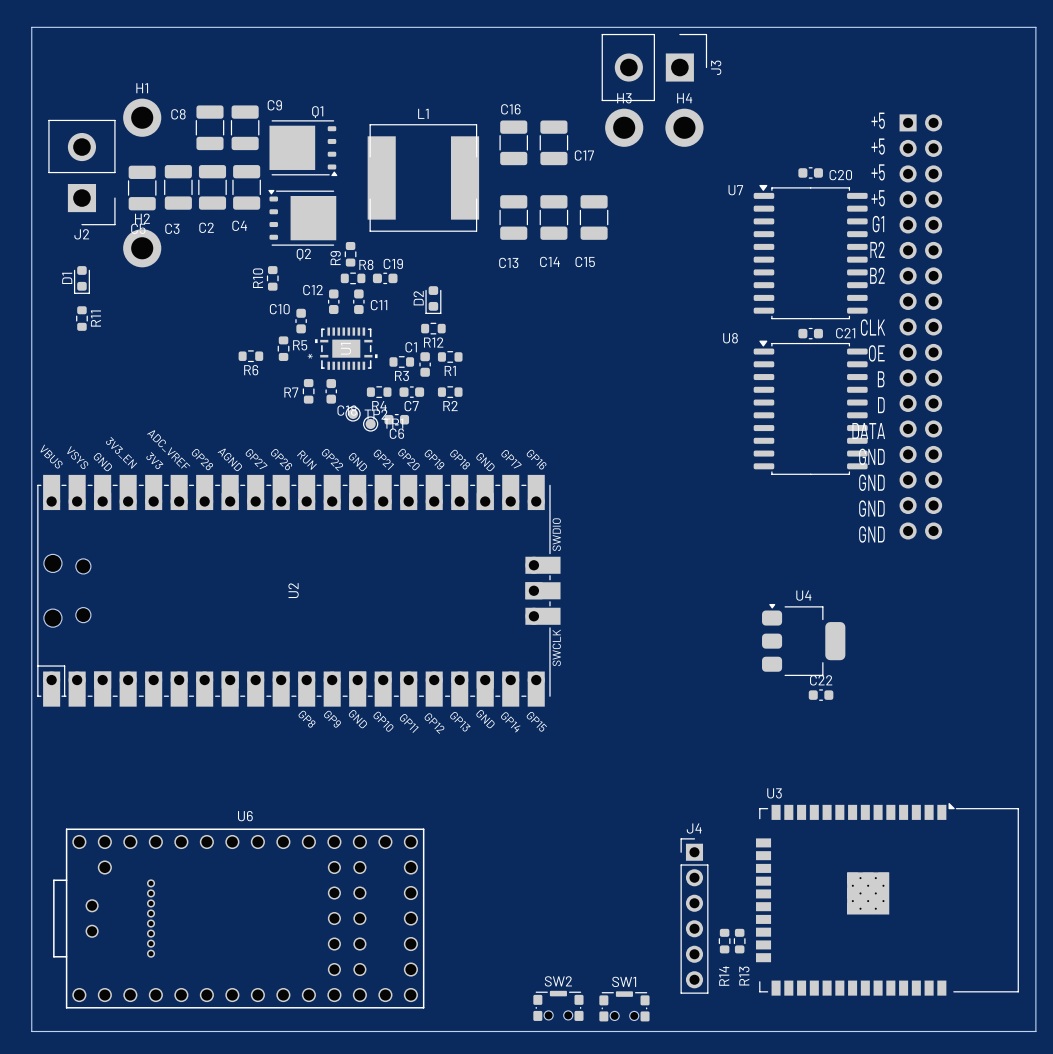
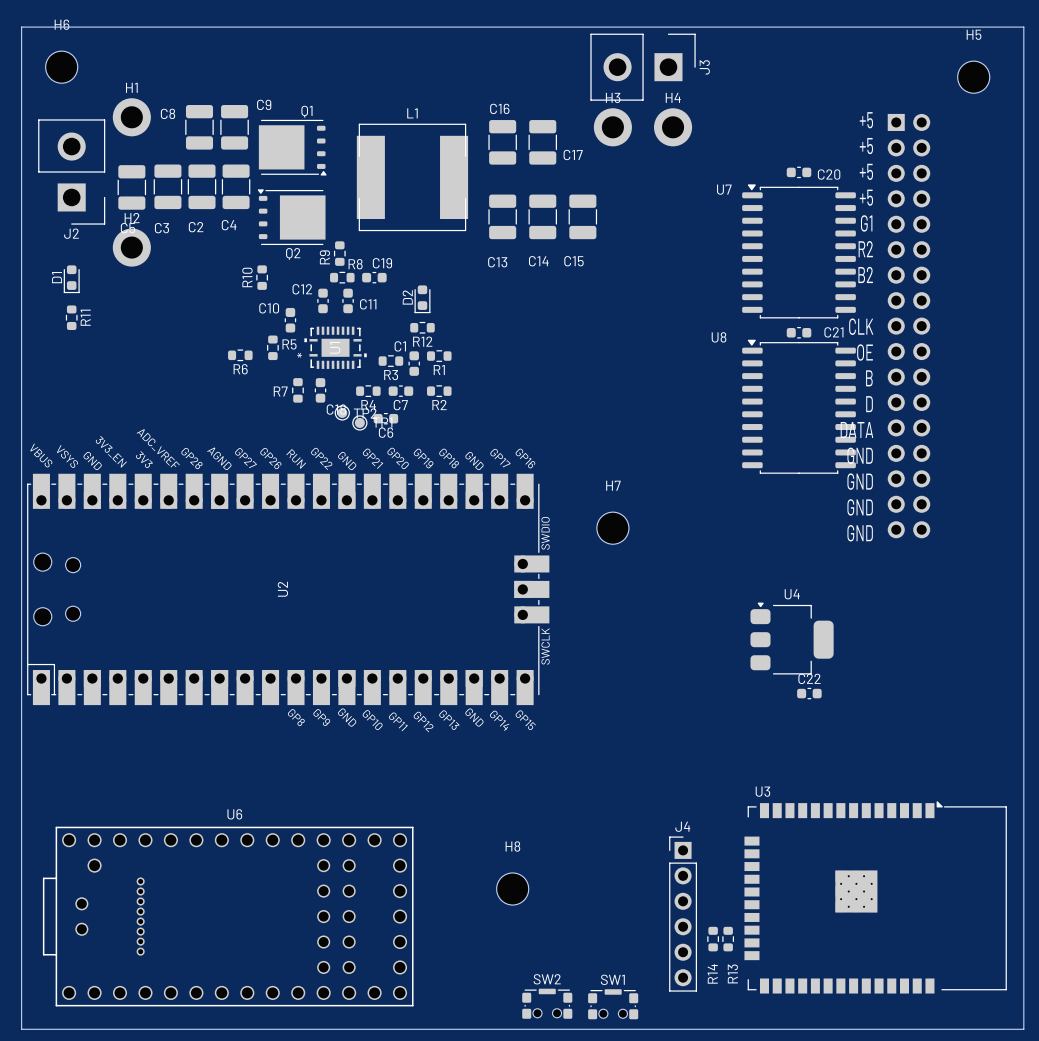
H6: none -> (61, 67)
H5: none -> (973, 77)
H7: none -> (612, 528)
H8: none -> (512, 888)

